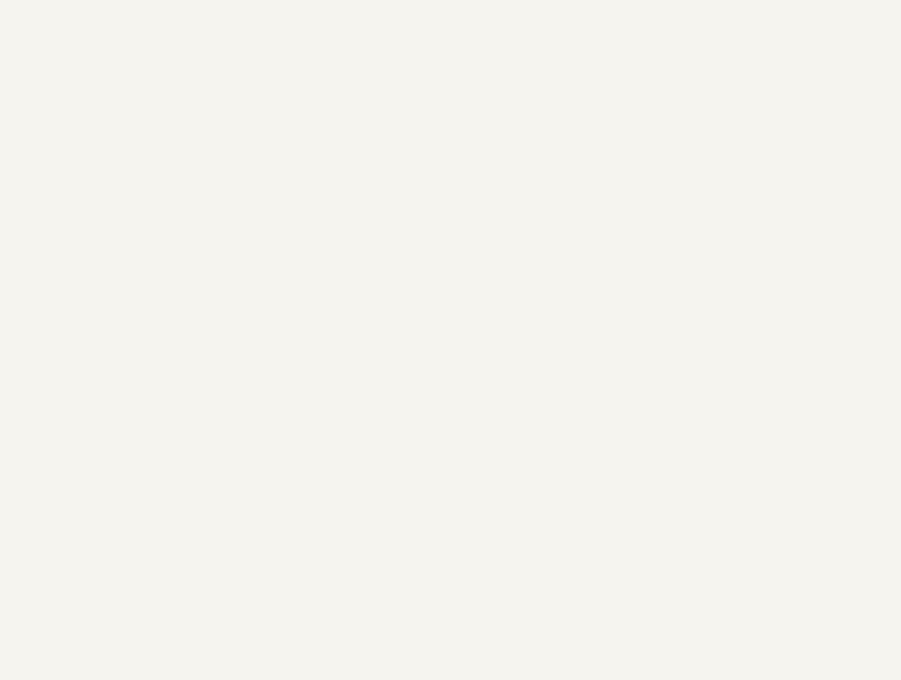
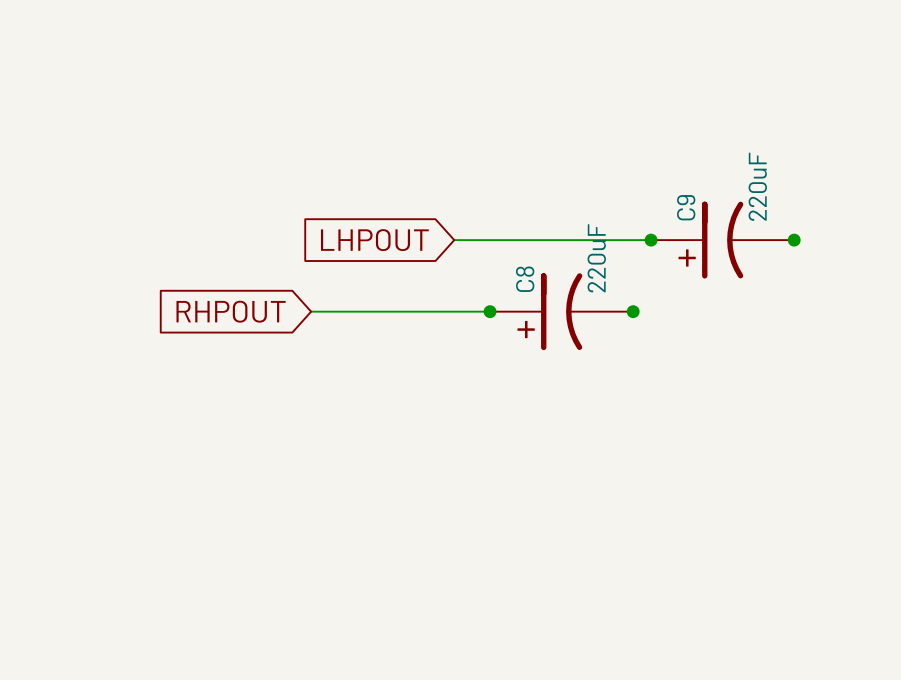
global label: none -> LHPOUT (374, 240)
wire: none -> (454, 240) (651, 240)
junction: none -> (651, 240)
C9: none -> 220uF (722, 240)
junction: none -> (794, 240)
global label: none -> RHPOUT (231, 311)
wire: none -> (311, 311) (490, 311)
junction: none -> (490, 311)
C8: none -> 220uF (561, 311)
junction: none -> (633, 311)

